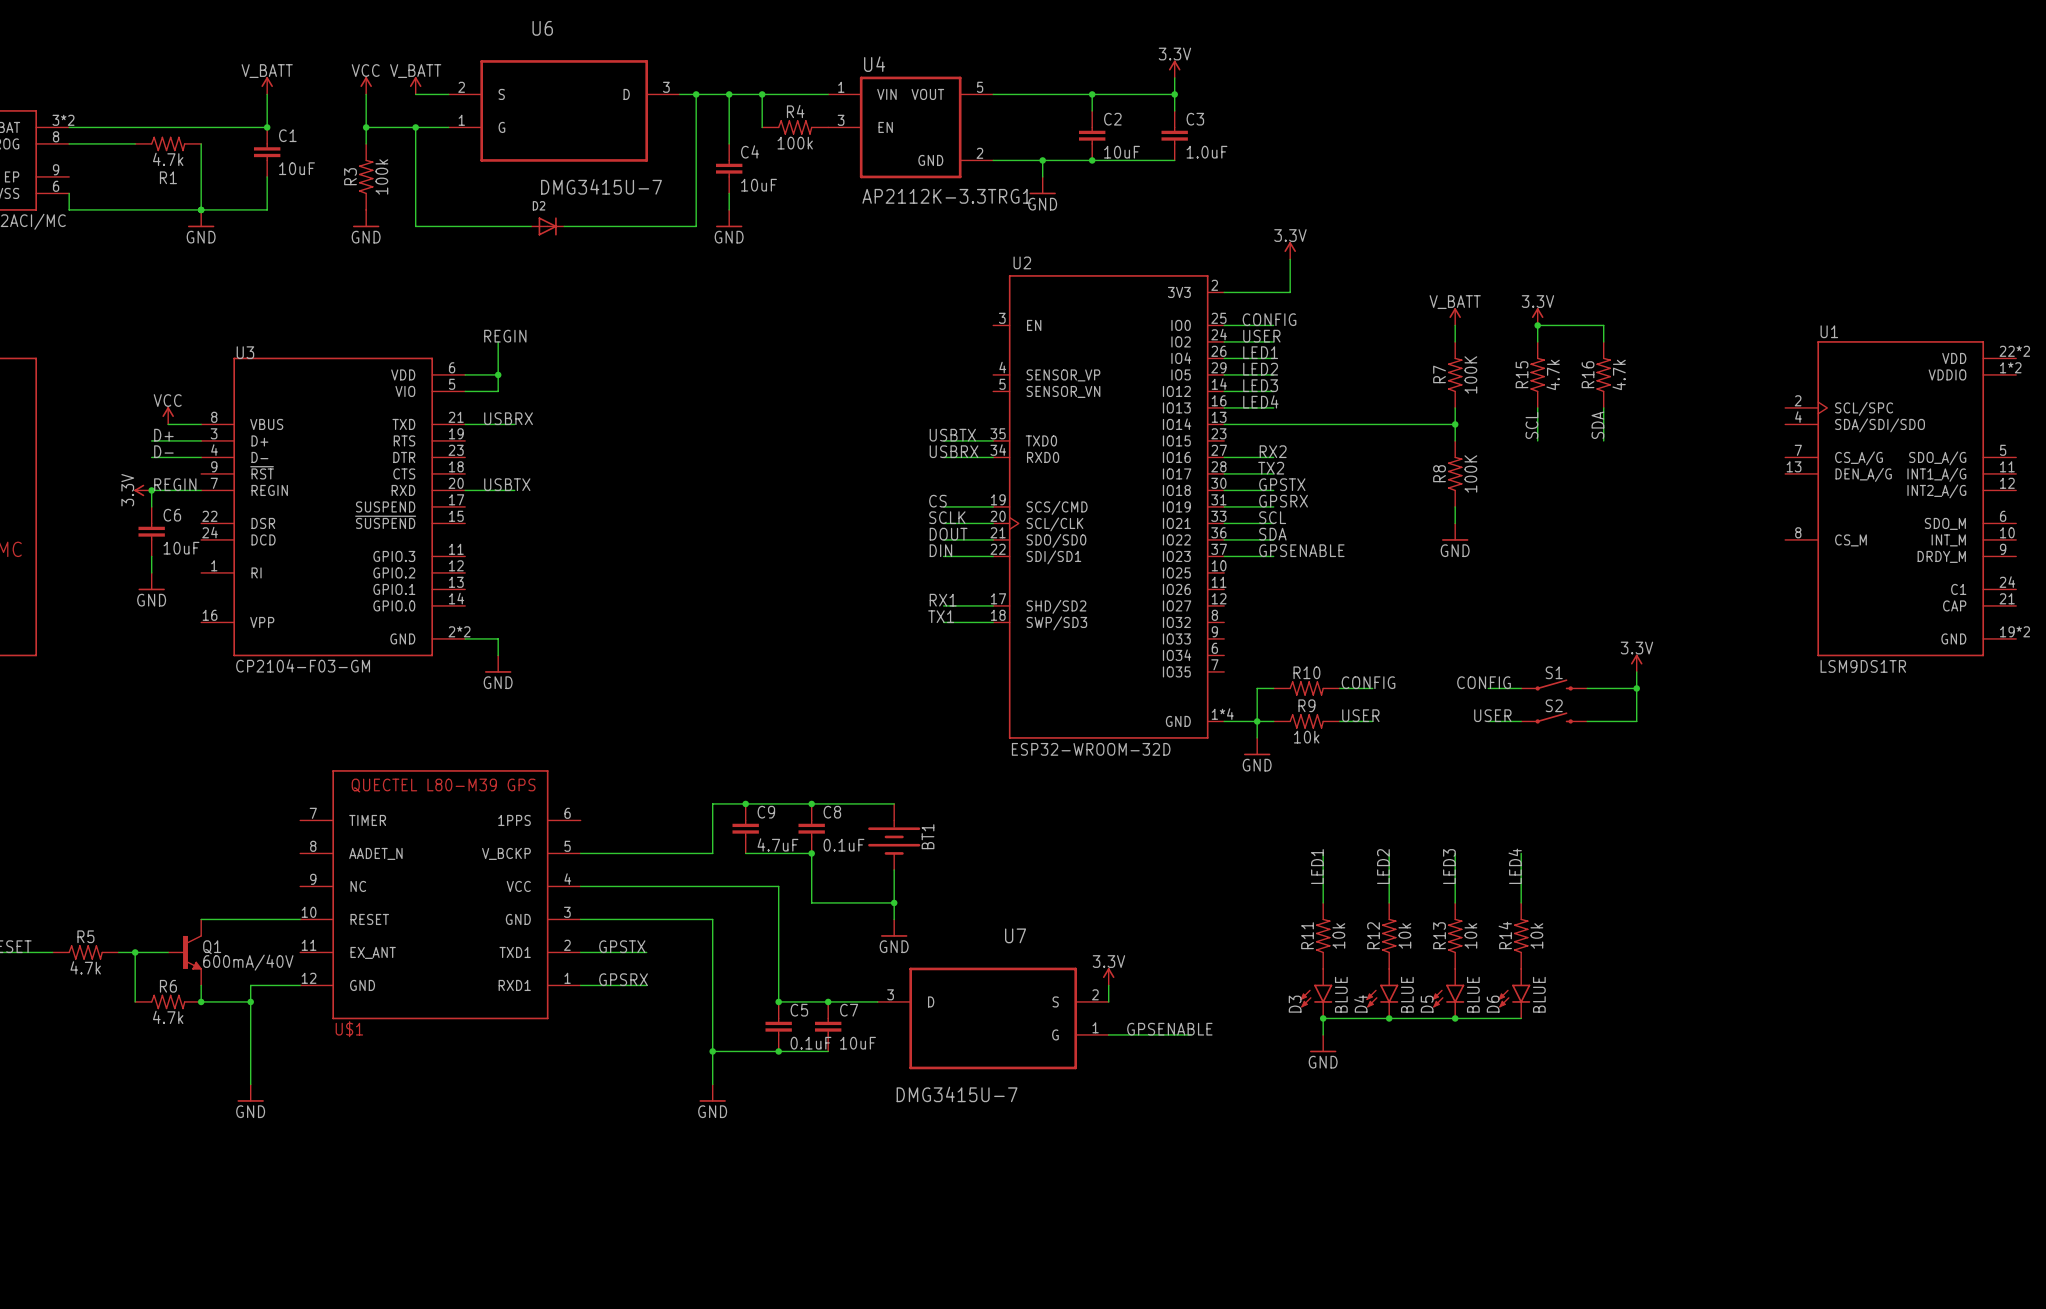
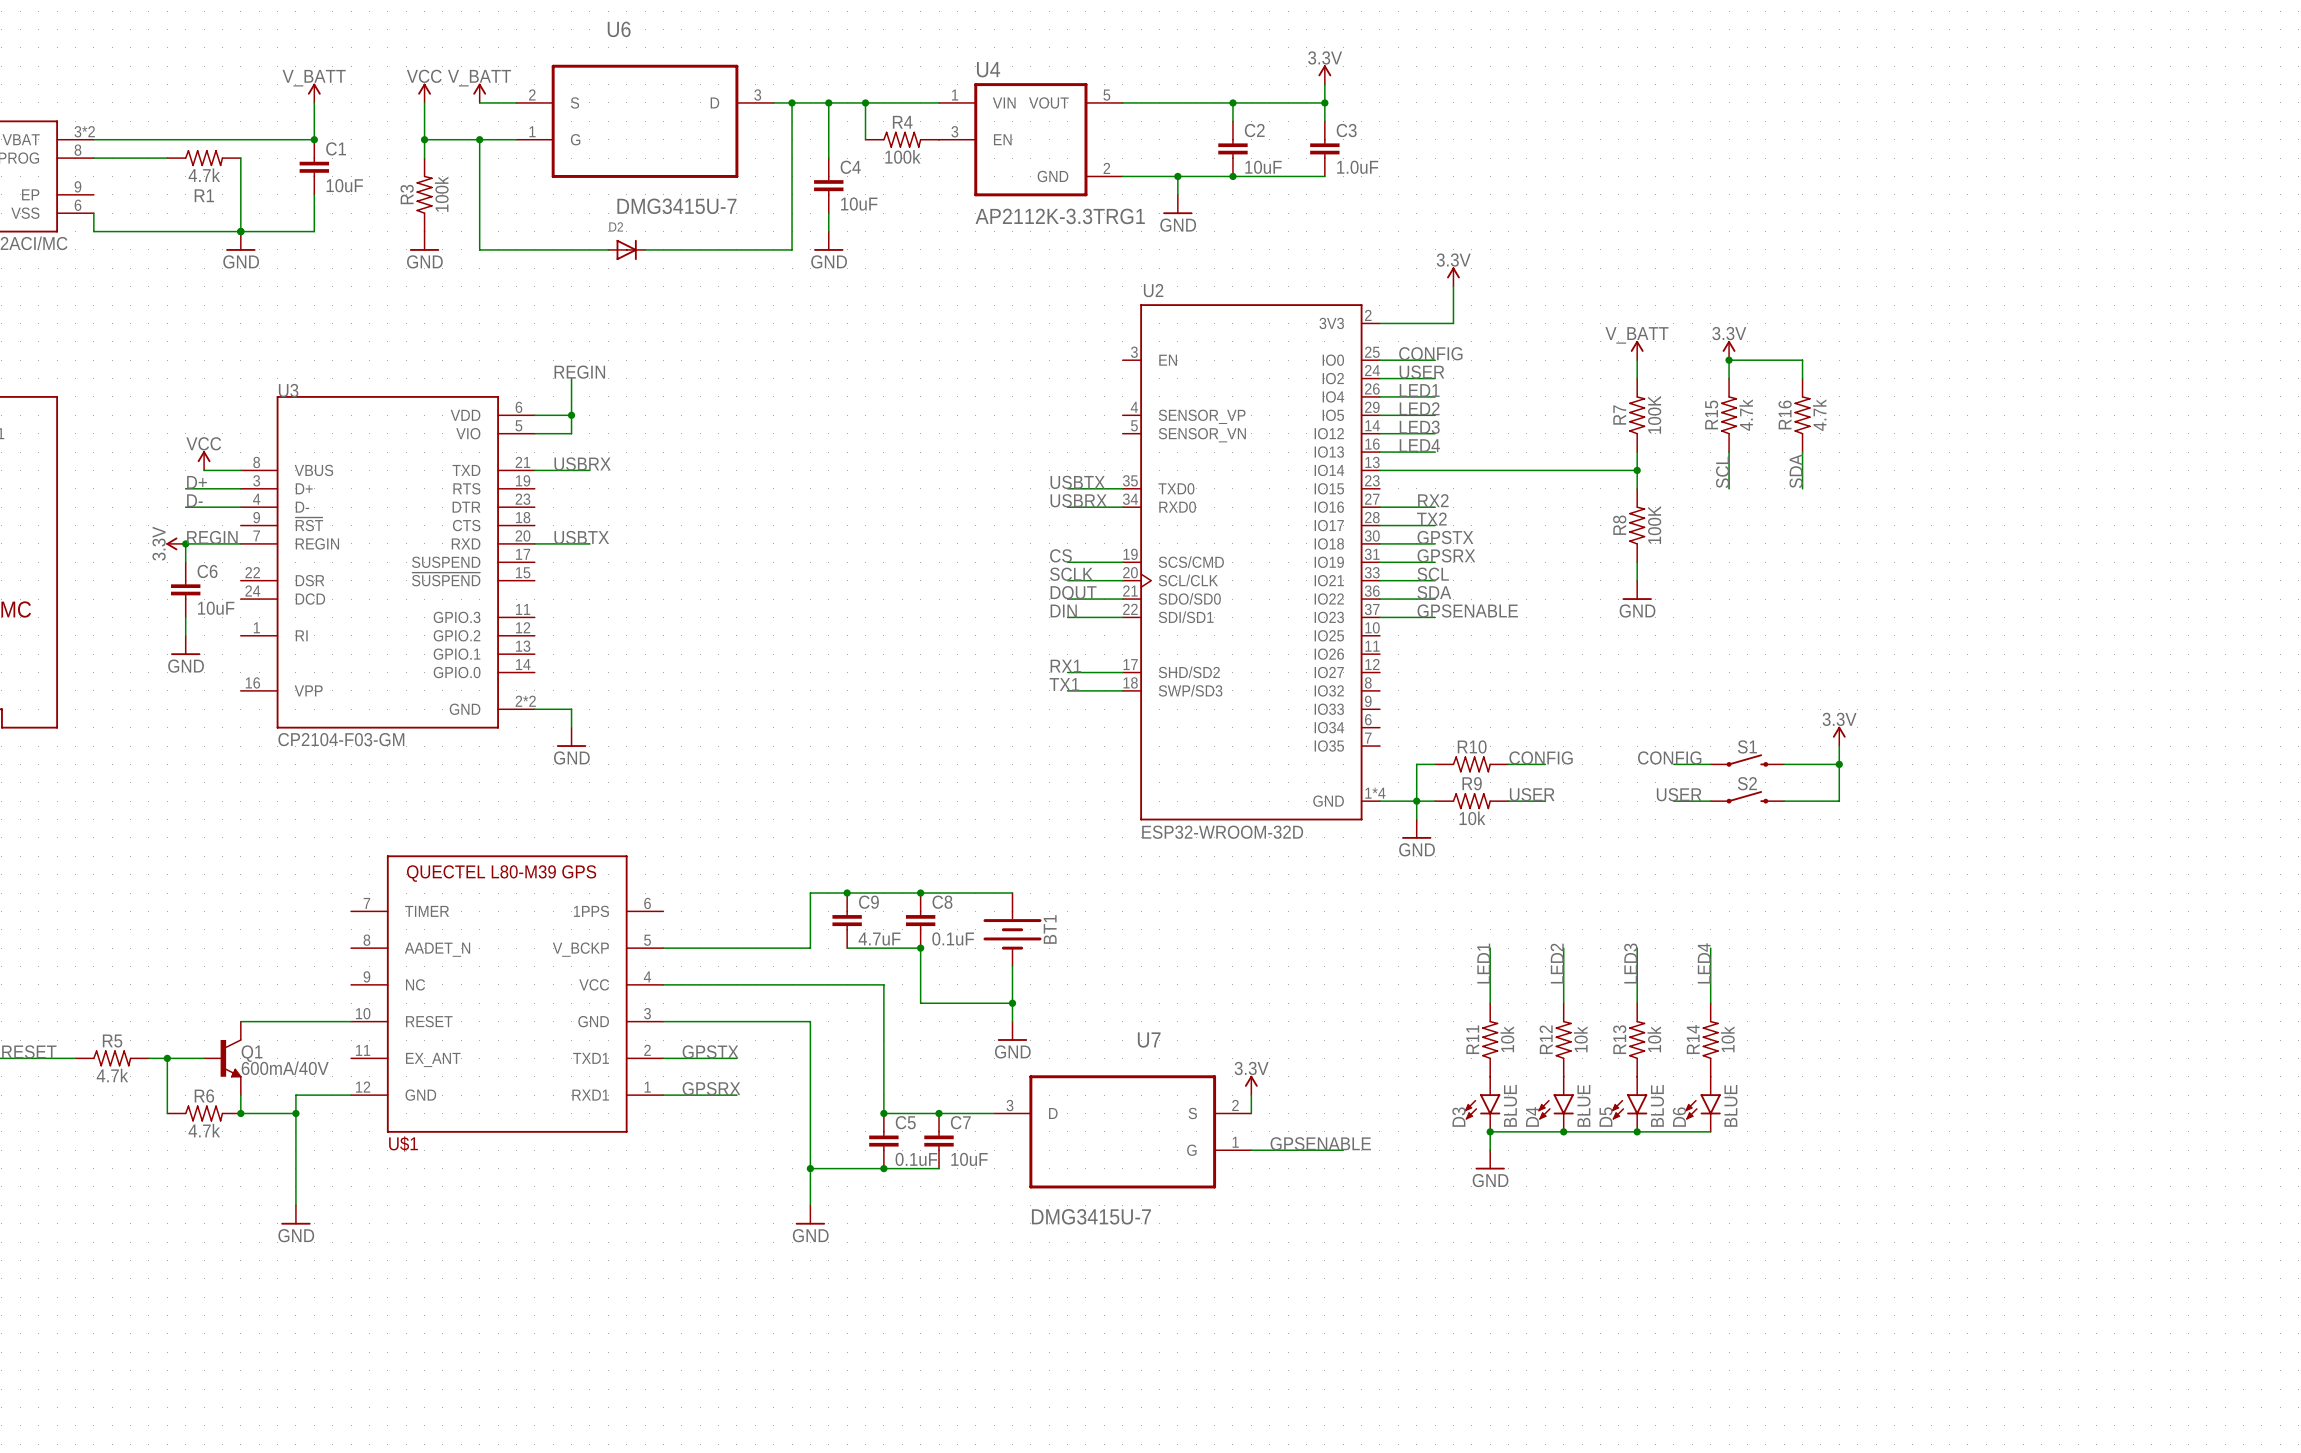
U1: LSM9DS1TR (1900, 498) -> none

